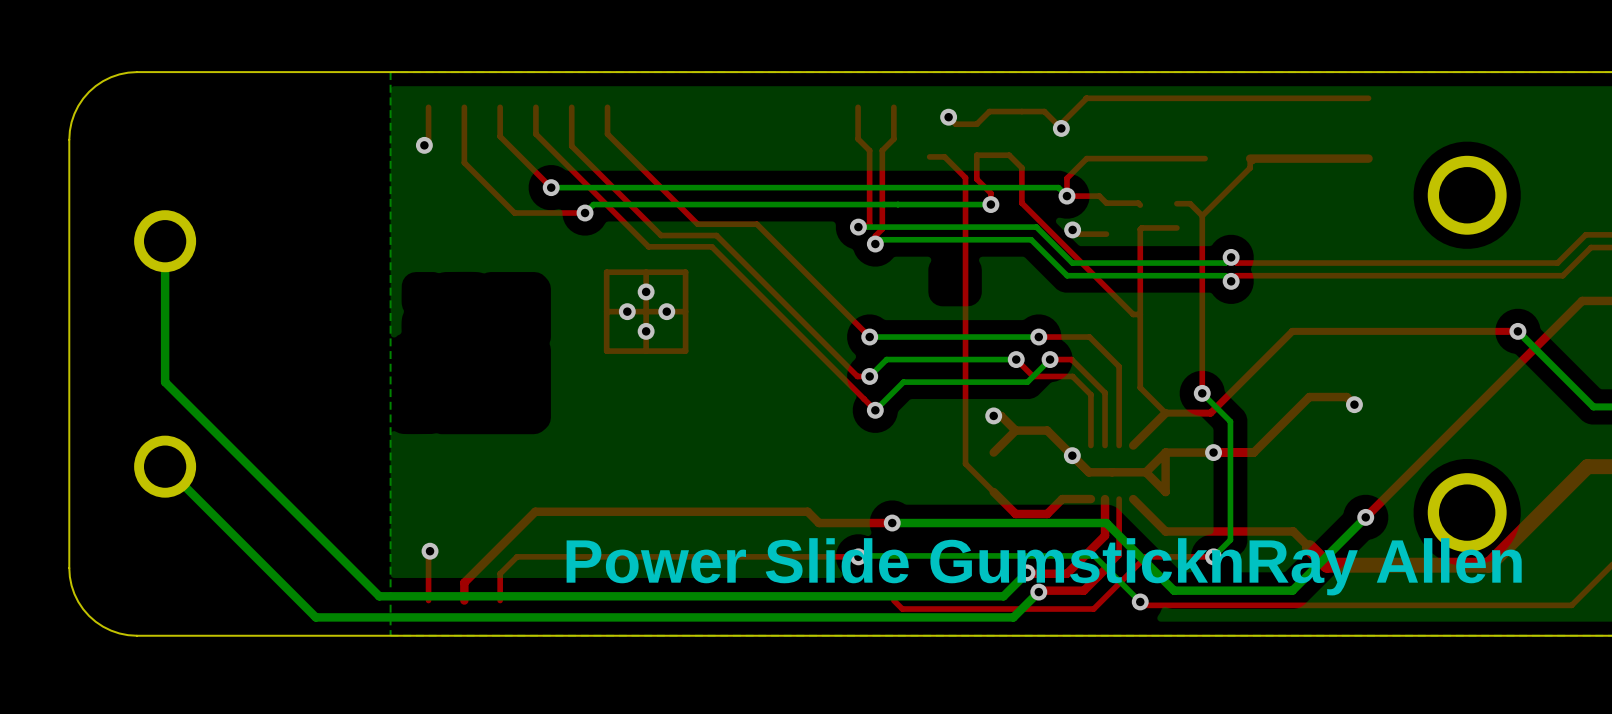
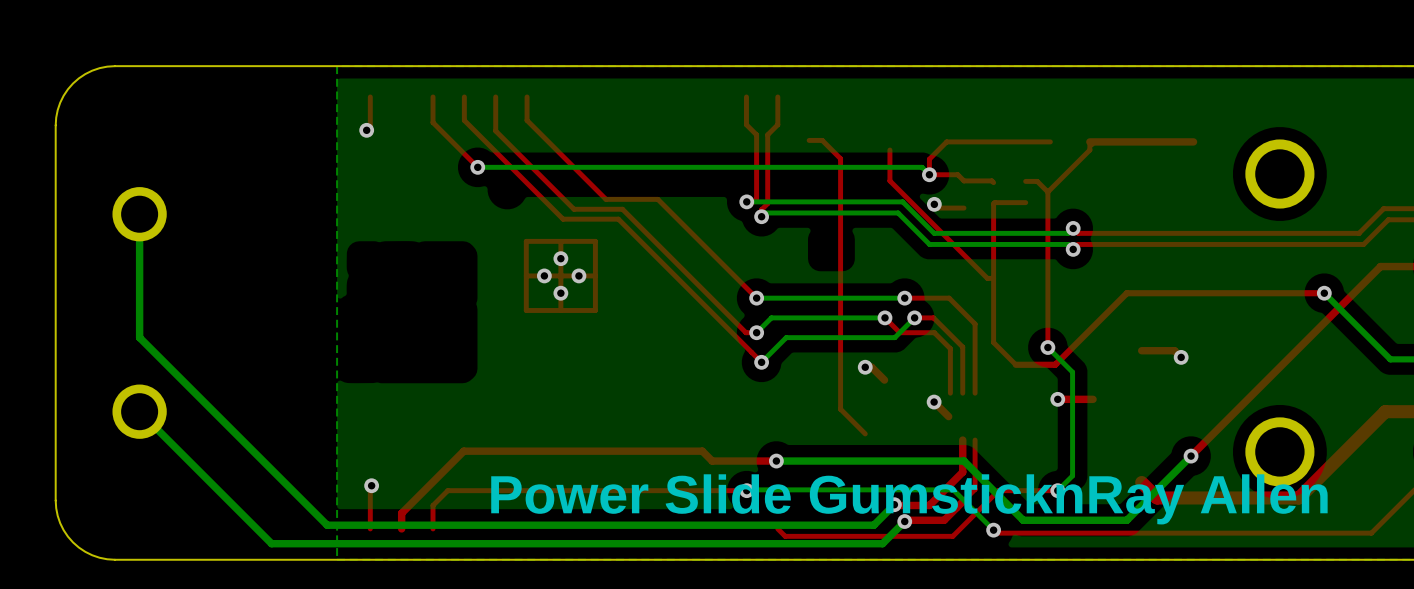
top track: (1086, 98) (1061, 123) (1061, 128) (1044, 111) (989, 111) (976, 124) (955, 124) (948, 117) -> none
top track: (1368, 98) (1085, 98) -> none
top track: (464, 107) (464, 162) (514, 213) (585, 213) -> none
via: (948, 117) -> none
via: (1061, 128) -> none
top track: (1021, 167) (1009, 155) (976, 155) (976, 179) (990, 193) (990, 204) -> none
bottom track: (990, 204) (593, 204) (585, 213) -> none
via: (990, 204) -> none
via: (585, 213) -> none
top track: (1309, 397) (1253, 452) -> none
top track: (1165, 413) (1133, 445) -> none
top track: (993, 452) (1015, 430) (1047, 430) (1072, 455) -> none
top track: (1165, 452) (1145, 472) -> none
top track: (1165, 452) (1165, 492) (1145, 472) -> none
top track: (1213, 452) (1165, 452) -> none
top track: (1145, 472) (1088, 472) -> none
top track: (993, 492) (1015, 514) (1047, 514) (1062, 499) (1090, 499) -> none
top track: (1133, 499) (1165, 531) (1293, 531) (1309, 547) -> none

